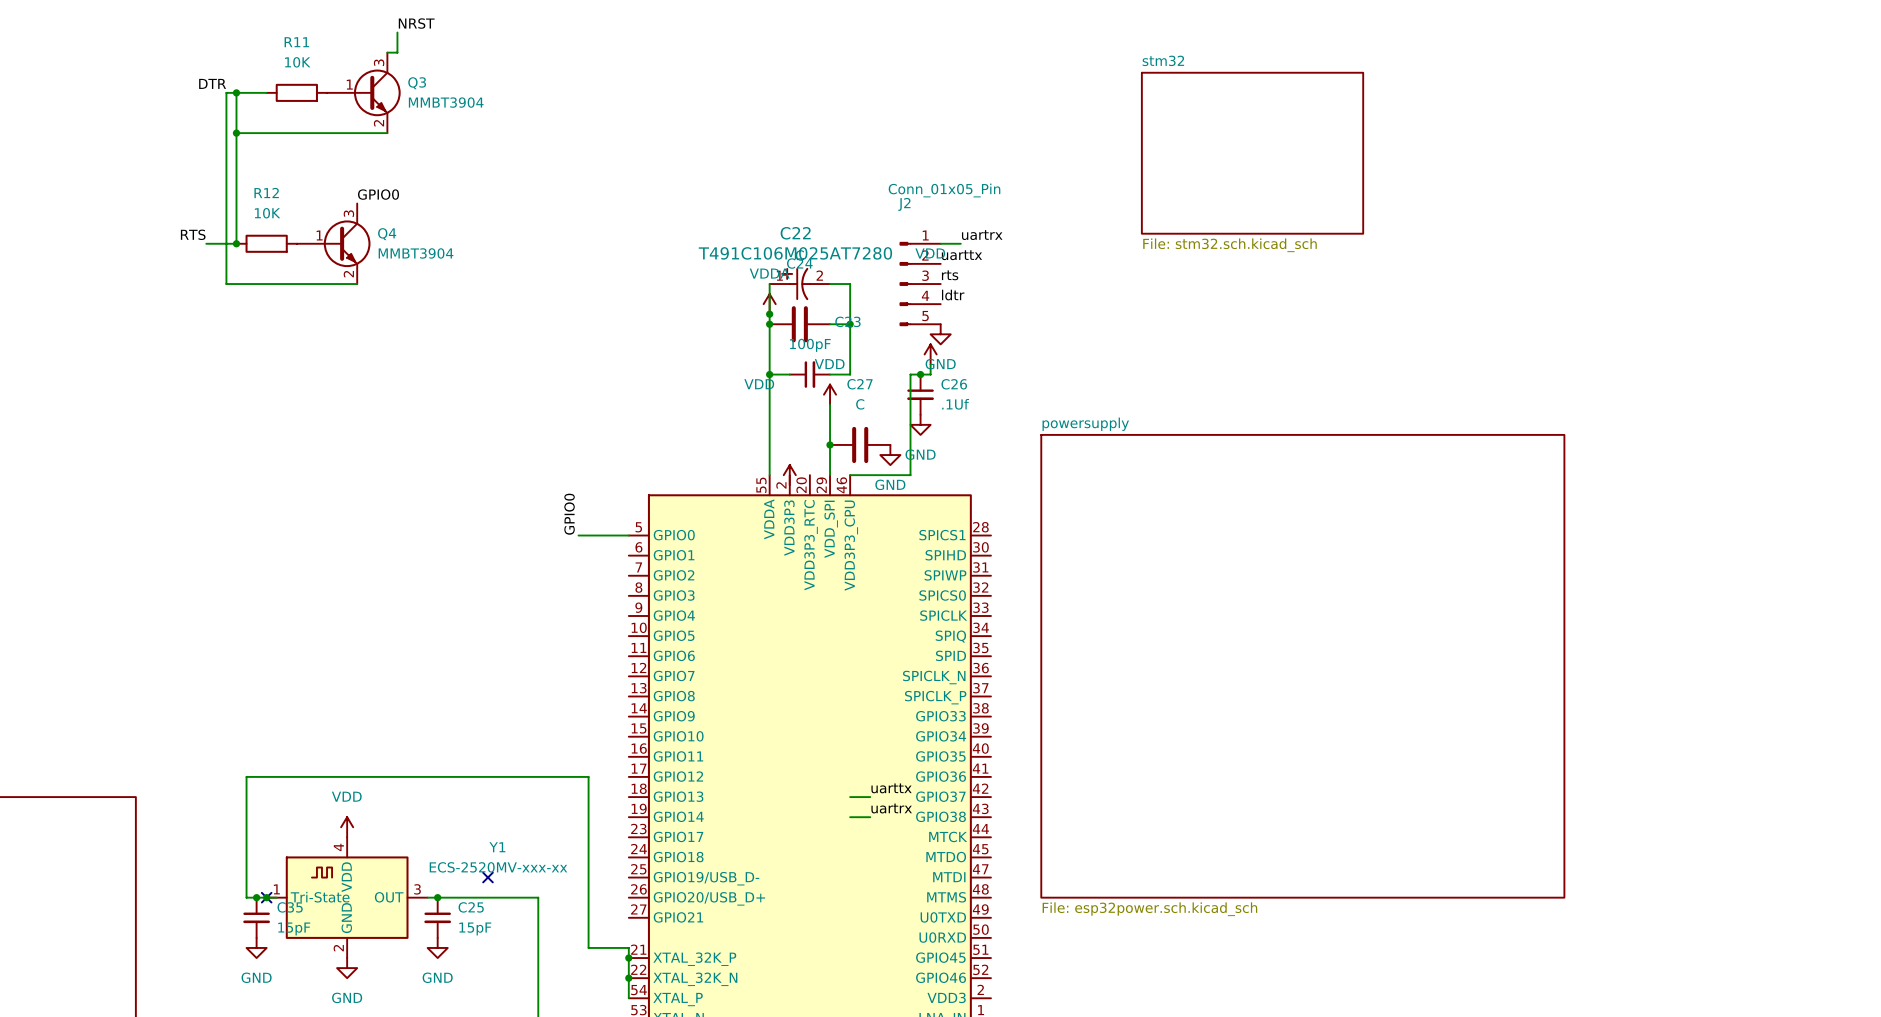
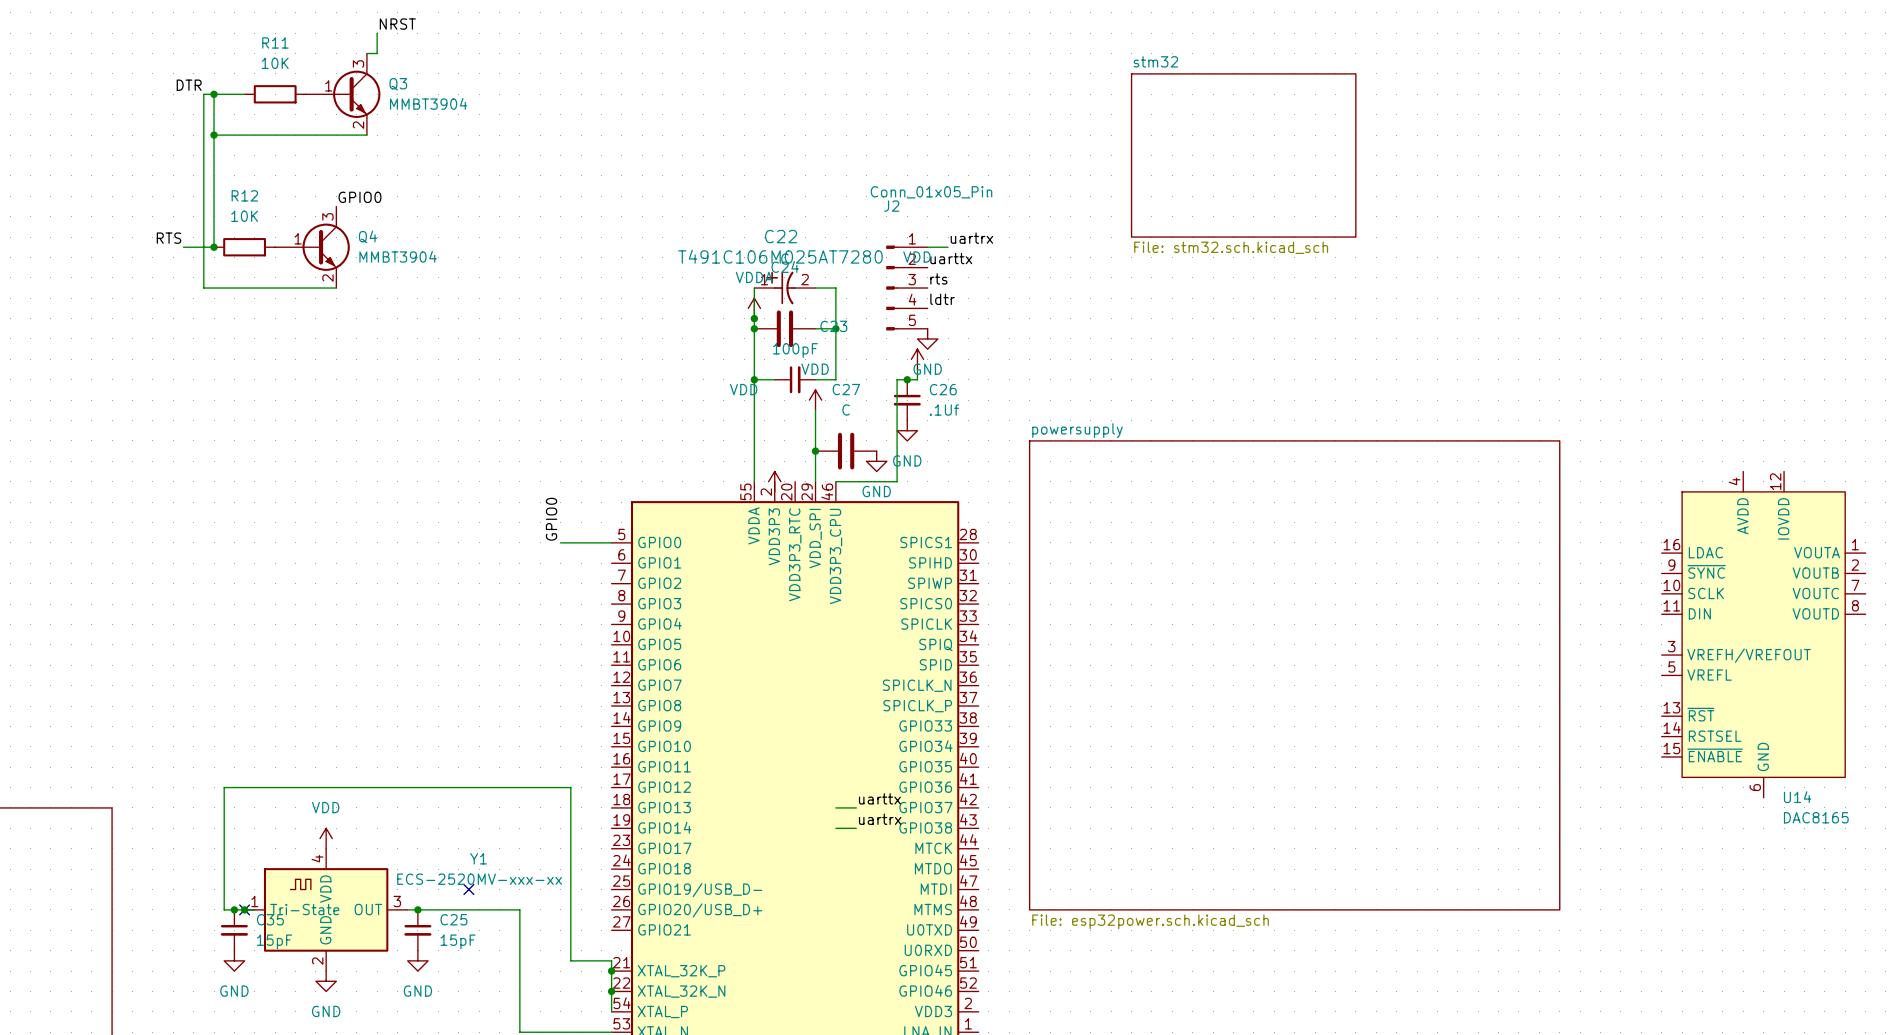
U14: none -> DAC8165 (1763, 634)

